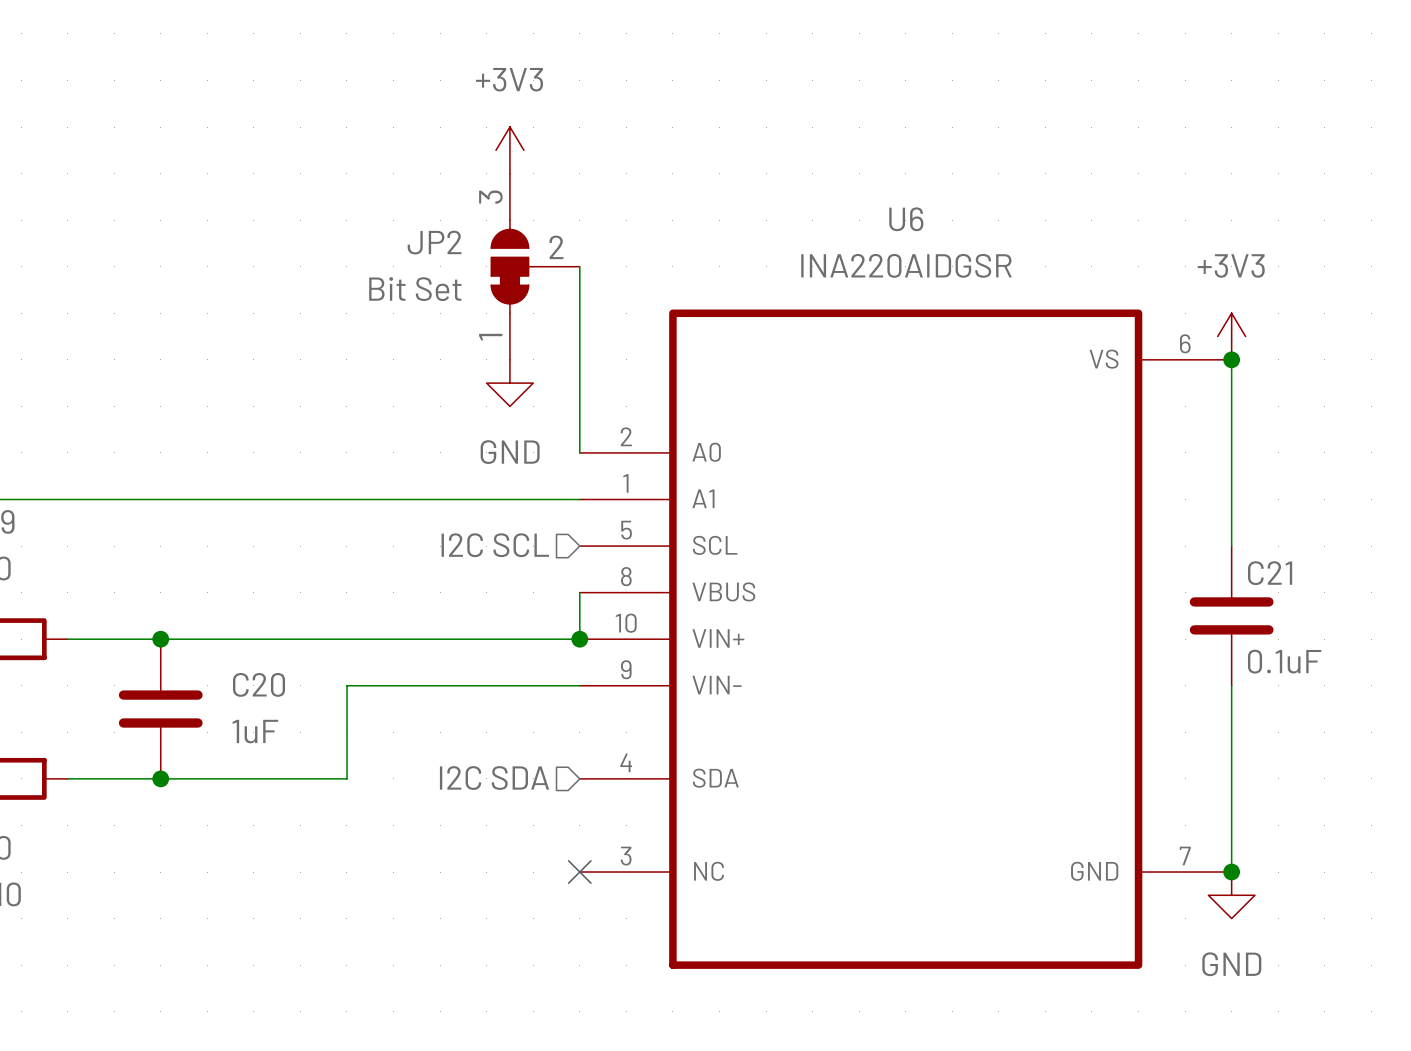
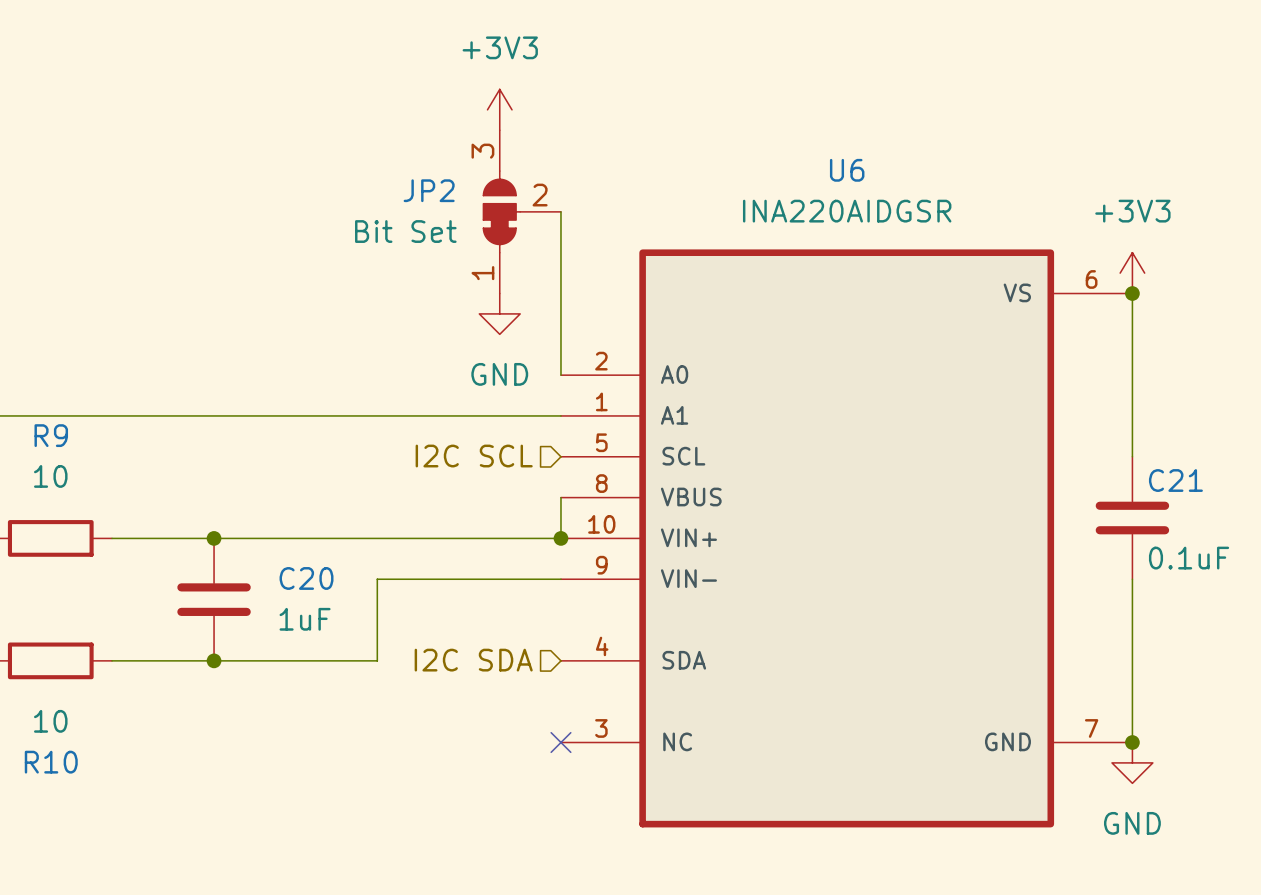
junction position: (160, 639) -> (214, 538)
wire: (370, 685) (346, 685) (346, 778) -> (377, 579) (377, 660) (356, 660)
C20 position: (160, 709) -> (214, 599)
junction position: (160, 778) -> (214, 660)

